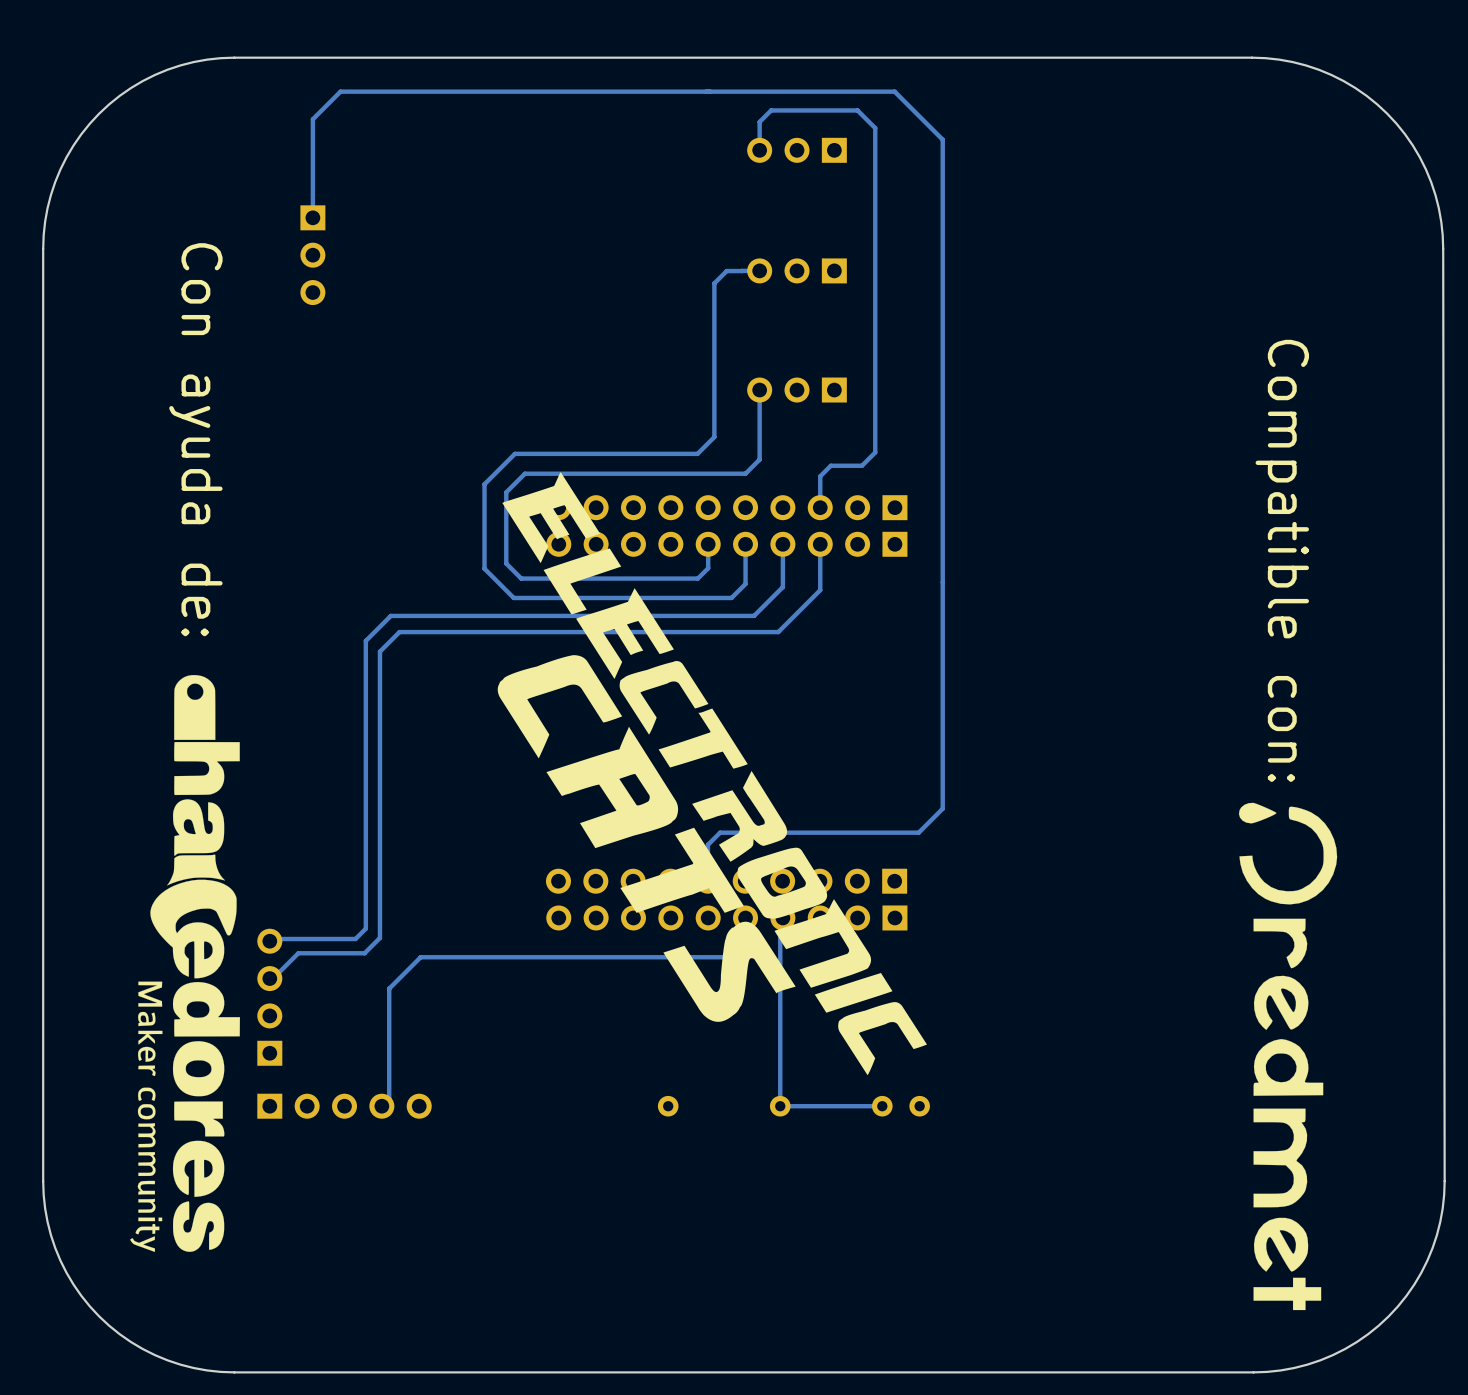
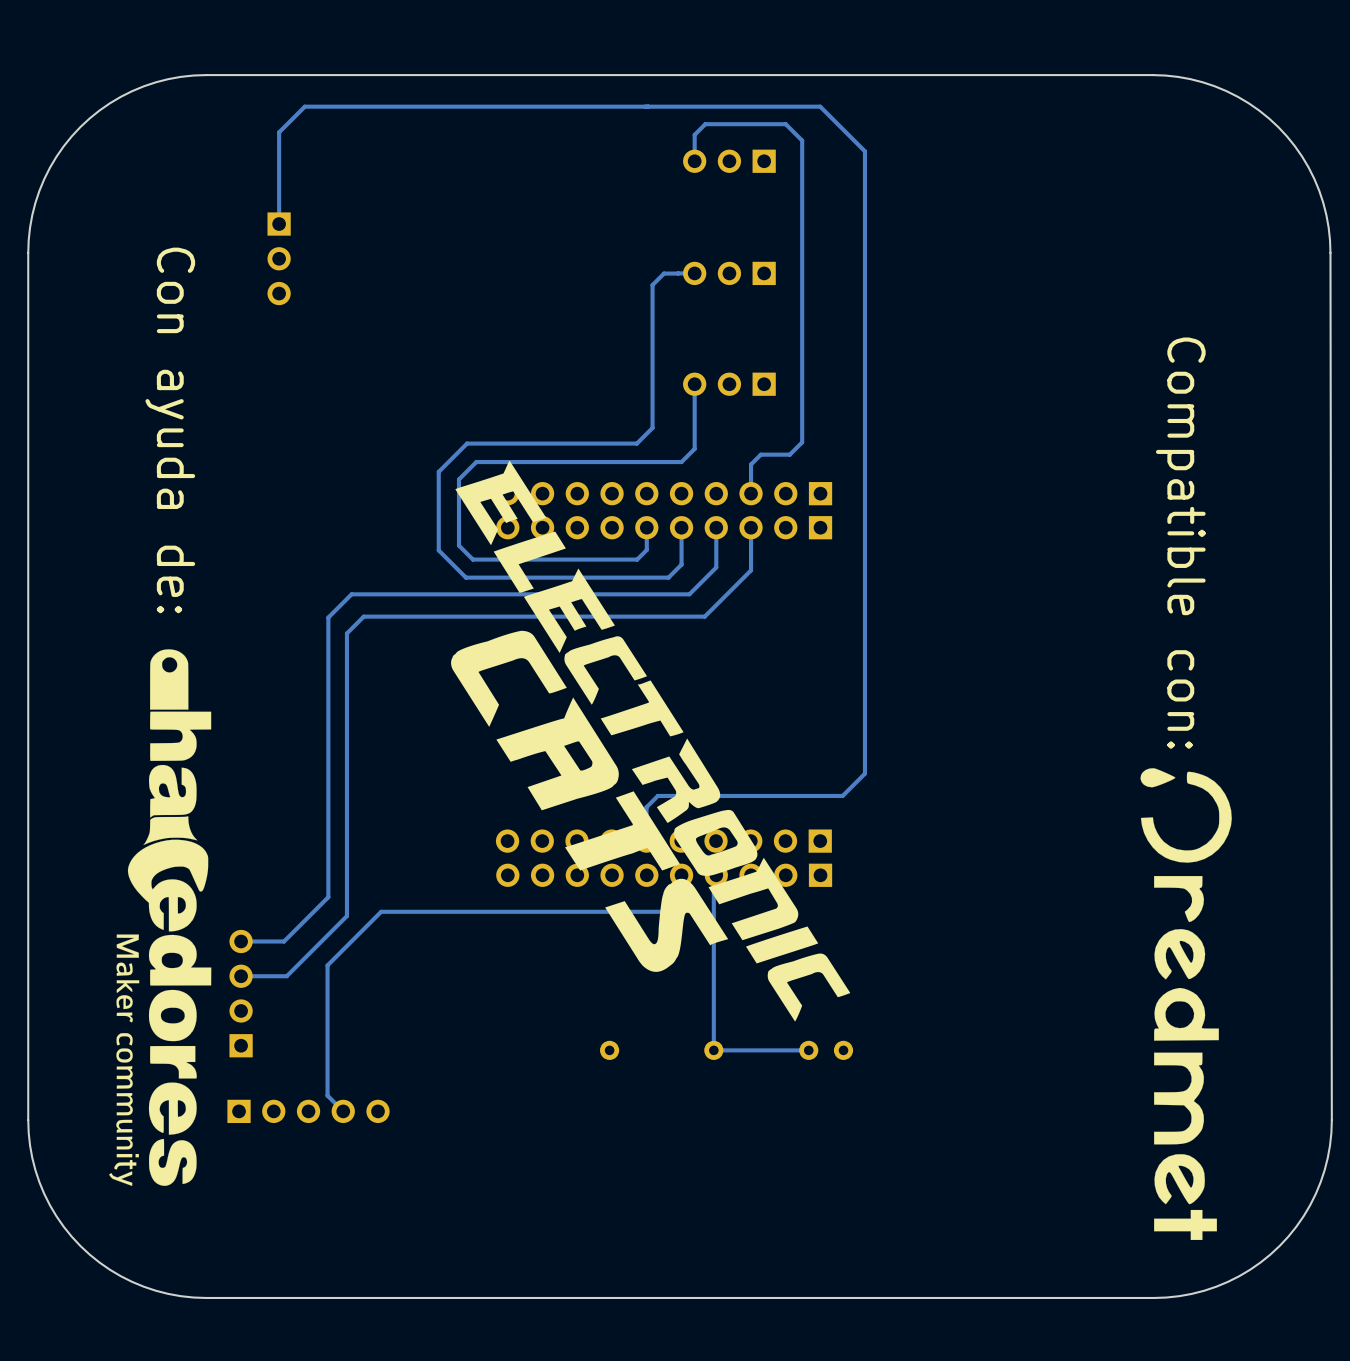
track: (778, 632) (399, 632) (379, 651) (379, 937) (364, 953) (298, 953) (273, 978) -> (712, 609) (704, 616) (363, 616) (346, 633) (346, 916) (286, 976) (241, 976)
track: (365, 928) (355, 939) (275, 939) (273, 940) -> (328, 885) (328, 897) (284, 941) (241, 941)
track: (422, 957) (389, 988) (389, 1098) (381, 1106) -> (381, 911) (327, 965) (327, 1095) (343, 1111)
part position: (269, 997) -> (241, 993)
part position: (344, 1106) -> (308, 1111)

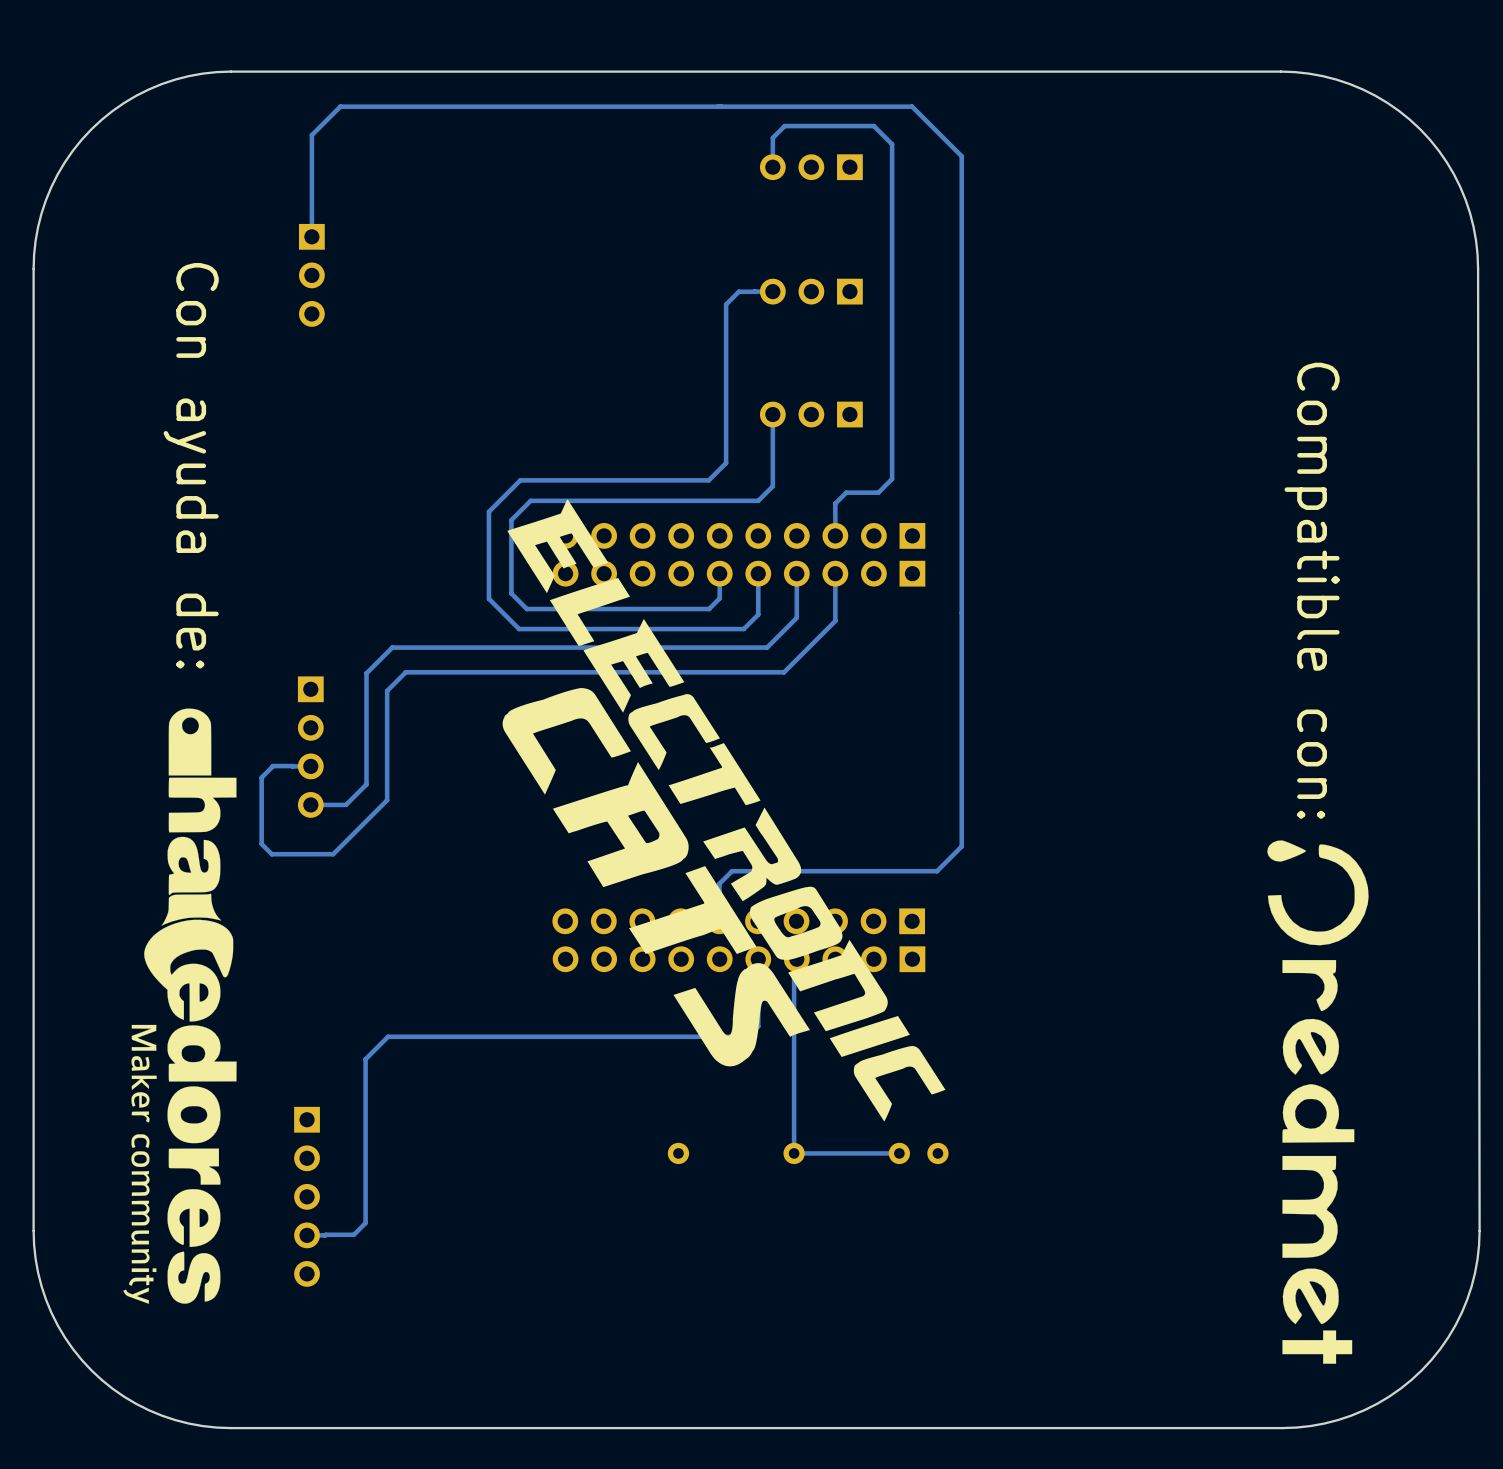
track: none -> (272, 766) (310, 766)
track: (328, 717) (328, 897) (284, 941) (241, 941) -> (366, 784) (346, 804) (310, 804)
track: (346, 731) (346, 916) (286, 976) (241, 976) -> (387, 800) (333, 854) (271, 854) (261, 844) (261, 777) (272, 766)
track: (681, 898) (668, 911) (381, 911) (347, 945) -> (758, 985) (758, 1026) (747, 1036) (388, 1036)
part rotation: 0° (241, 993) -> 180° (310, 747)
part position: (241, 993) -> (310, 747)
track: (327, 1095) (343, 1111) -> (365, 1203) (365, 1223) (353, 1234) (307, 1235)
part rotation: 0° (308, 1111) -> 90° clockwise (307, 1196)

